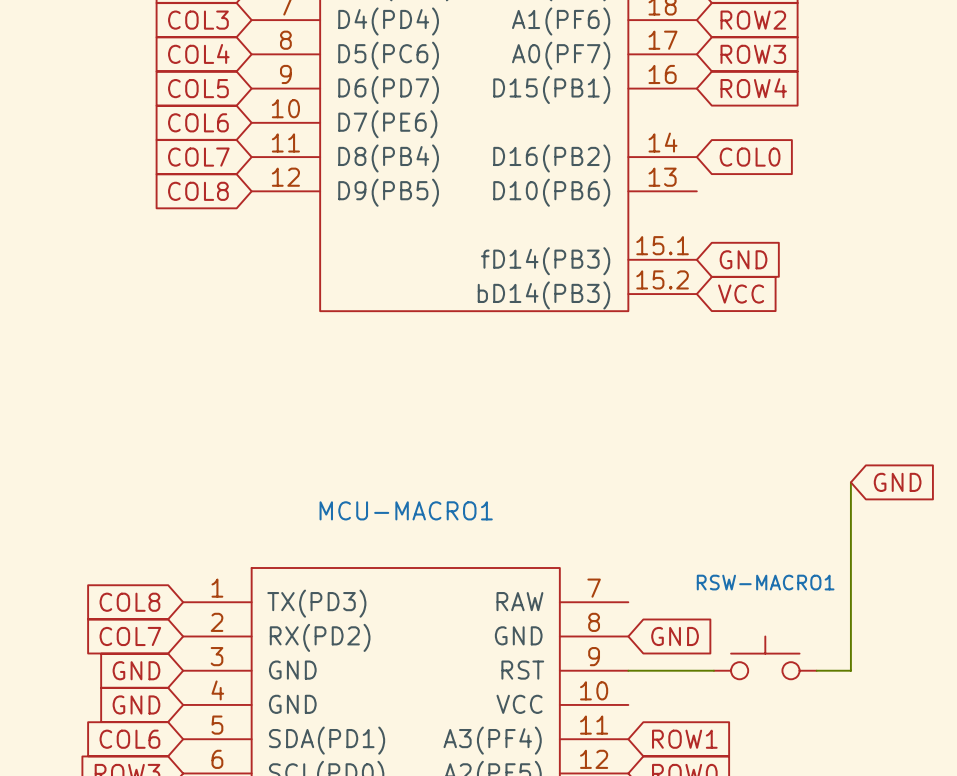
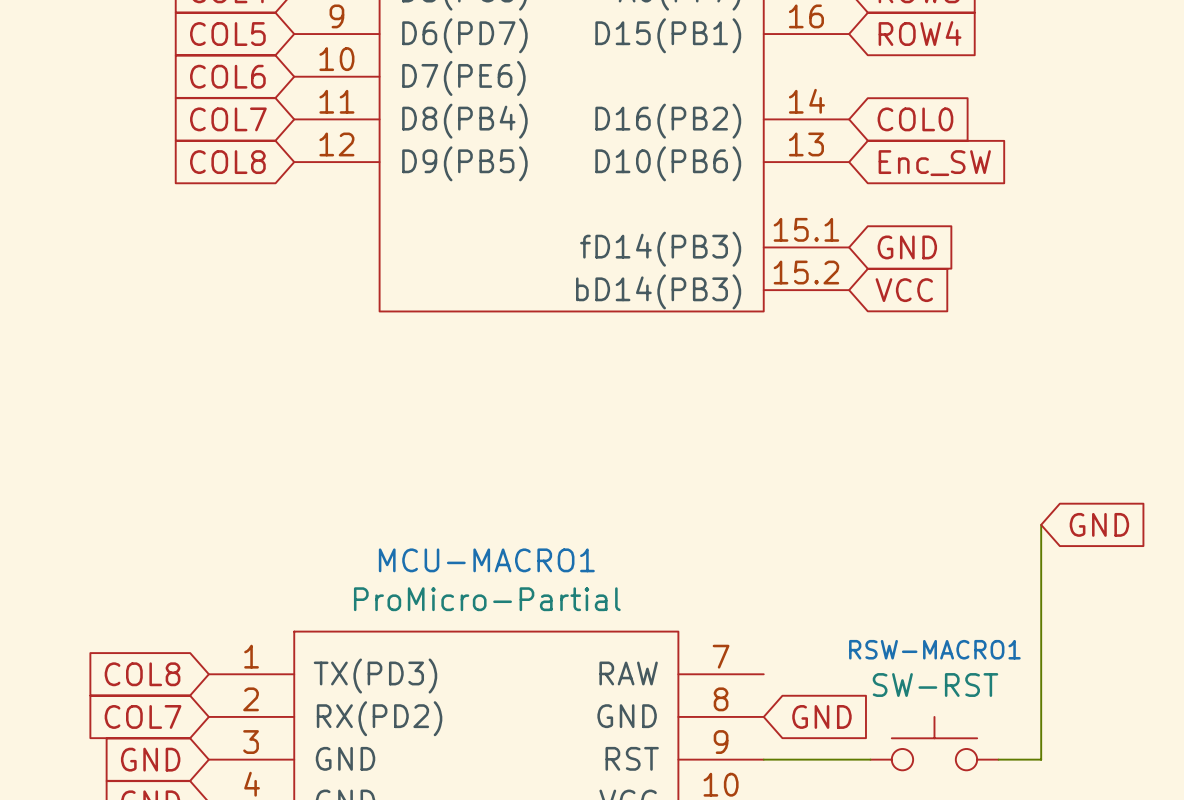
global label: none -> Enc_SW (934, 163)
MCU-MACRO1 value: none -> ProMicro-Partial (487, 599)
RSW-MACRO1 value: none -> SW-RST (935, 685)

